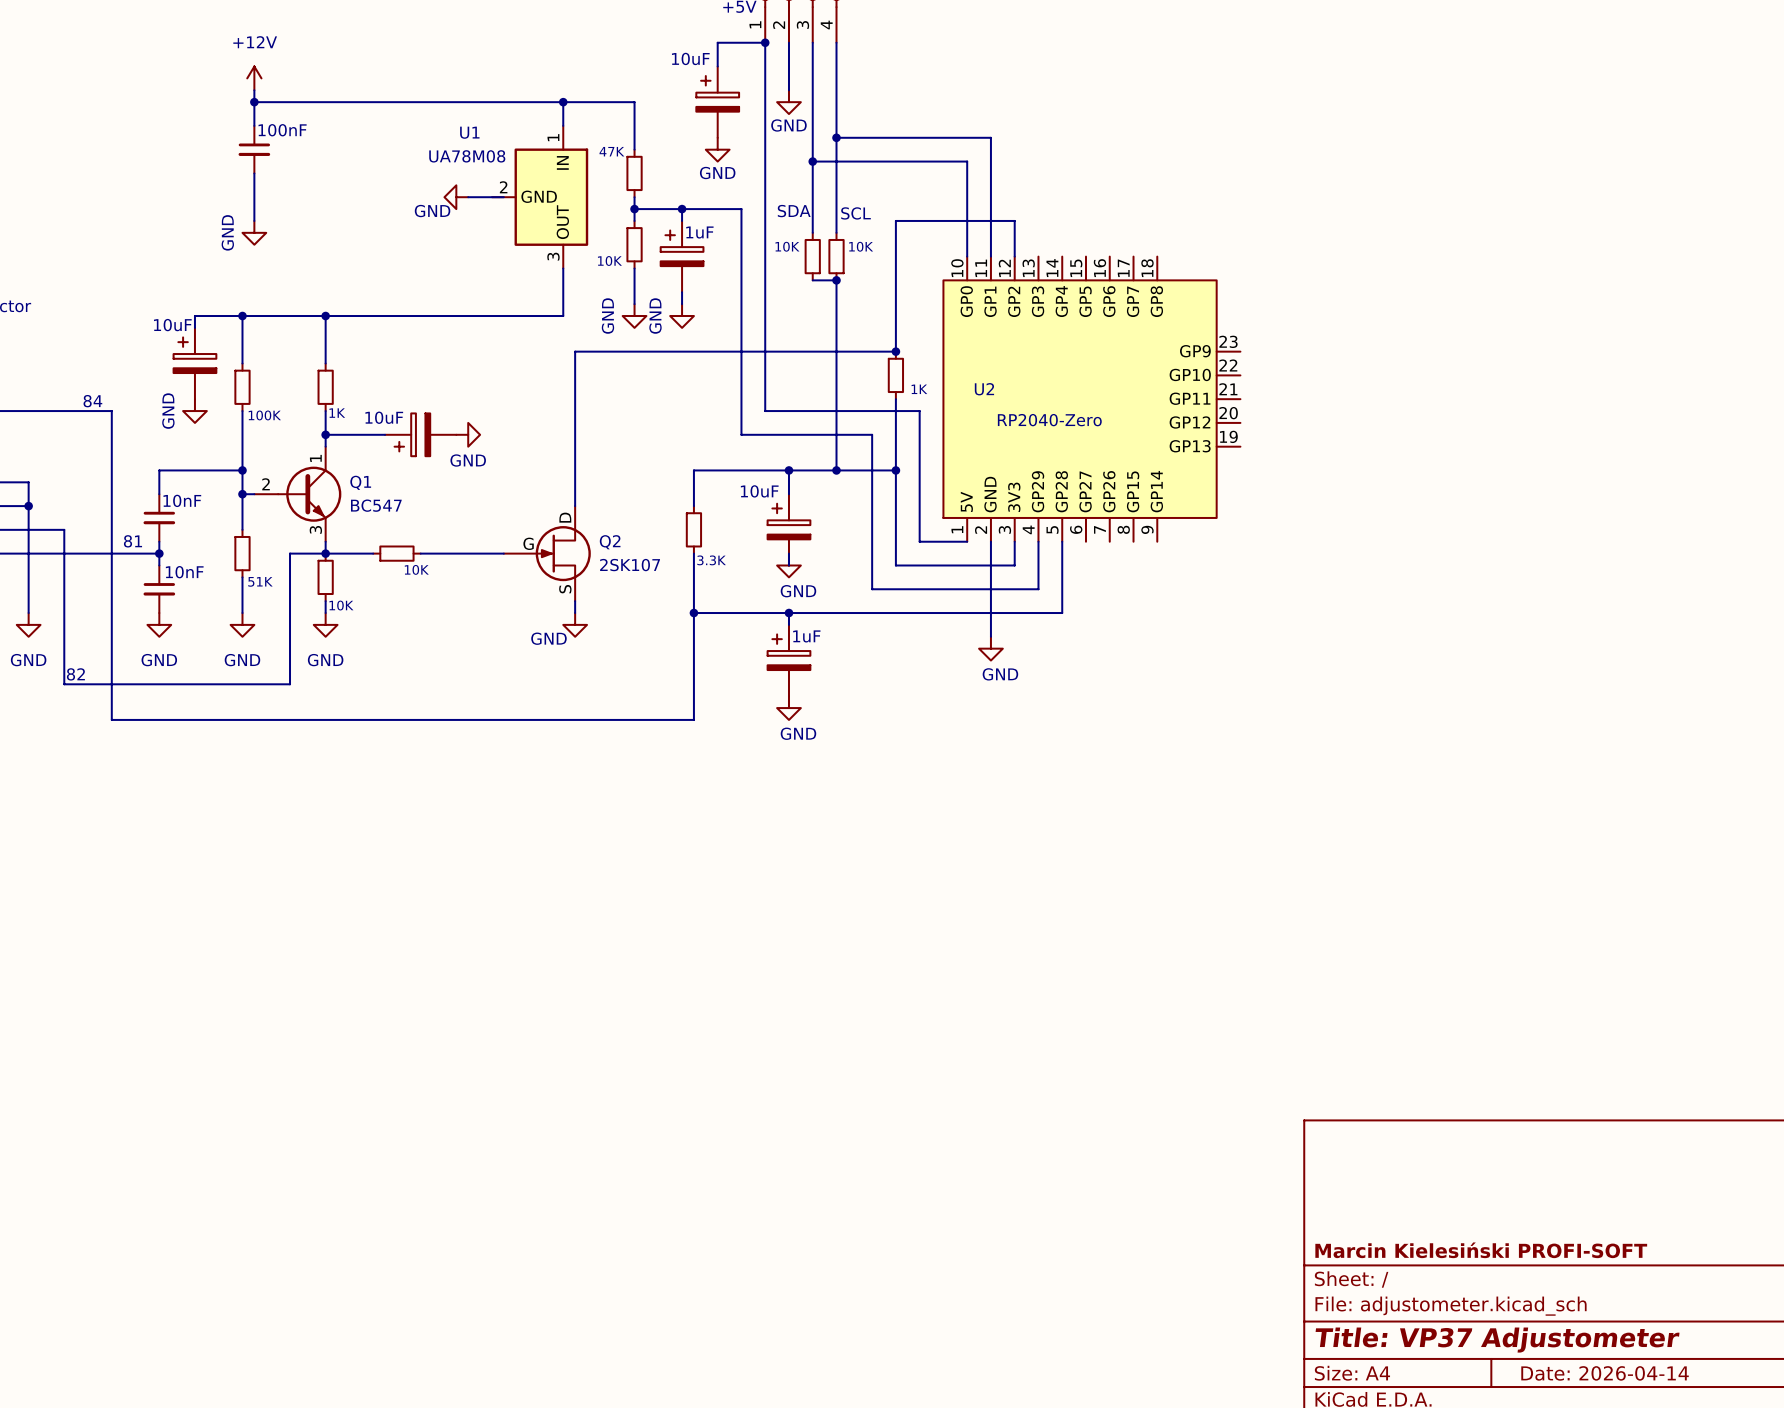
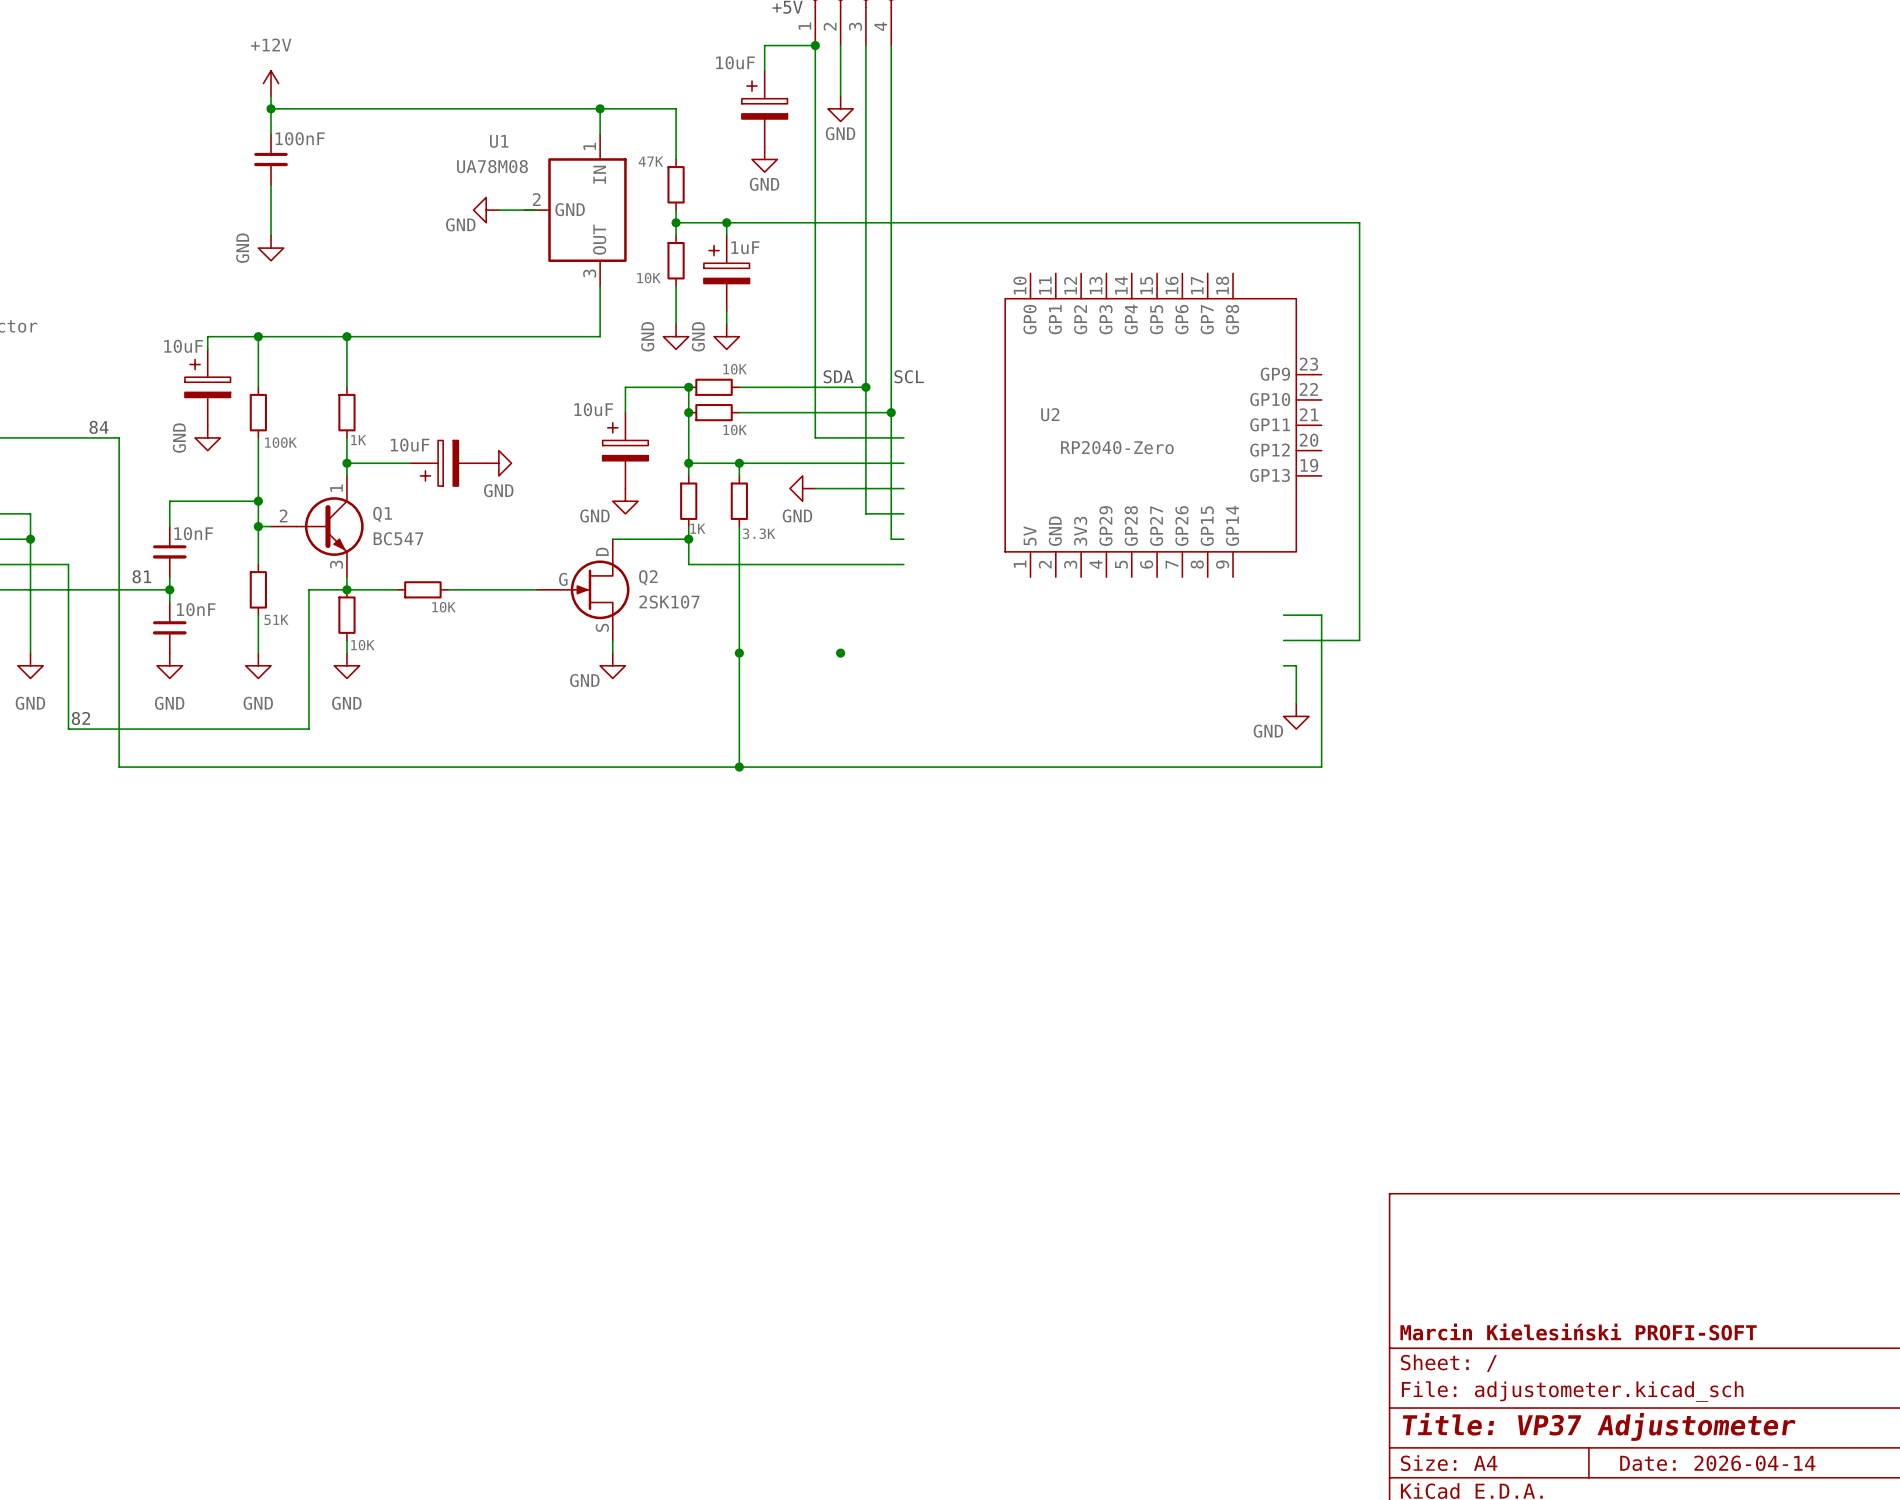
wire: (836, 137) (990, 137) (990, 256) -> none
junction: (836, 137) -> none
wire: (812, 161) (967, 161) (967, 256) -> none
junction: (812, 161) -> none
wire: (741, 209) (741, 434) -> (688, 463) (789, 463)
wire: none -> (789, 222) (1359, 222) (1359, 640) (1283, 640)
text position: SDA (794, 211) -> SDA (838, 376)
text position: SCL (856, 213) -> SCL (909, 376)
wire: none -> (865, 248) (865, 513) (903, 513)
10K: (812, 256) -> none
10K: (836, 256) -> none
wire: (1014, 256) (1014, 220) (895, 220) (895, 351) (575, 351) (575, 506) -> (688, 539) (612, 539)
wire: (812, 280) (836, 280) -> (891, 248) (891, 298)
junction: (836, 280) -> none
junction: (895, 351) -> none
junction: none -> (688, 387)
10K: none -> (714, 387)
wire: none -> (739, 387) (865, 387)
junction: none -> (865, 387)
1K: (895, 375) -> none
wire: none -> (625, 412) (625, 387) (688, 387) (688, 475)
junction: none -> (688, 412)
10K: none -> (714, 412)
wire: none -> (739, 412) (891, 412)
junction: none -> (891, 412)
wire: (895, 399) (895, 565) (1014, 565) (1014, 541) -> none
wire: (848, 411) (919, 411) (919, 541) (967, 541) -> none
junction: none -> (688, 463)
junction: none -> (739, 463)
wire: (848, 434) (872, 434) (872, 589) (1038, 589) (1038, 541) -> none
power symbol: none -> GND (802, 488)
wire: none -> (815, 488) (903, 488)
power symbol: none -> GND (625, 501)
1K: none -> (688, 501)
wire: (788, 470) (788, 494) -> none
junction: (788, 470) -> none
wire: none -> (891, 501) (891, 539) (903, 539)
junction: (836, 470) -> none
wire: (895, 470) (693, 470) (693, 494) -> none
junction: (895, 470) -> none
wire: none -> (688, 526) (688, 564) (903, 564)
junction: none -> (688, 539)
wire: none -> (739, 539) (739, 589)
3.3K position: (693, 529) -> (739, 501)
10uF position: (788, 529) -> (625, 450)
wire: (990, 541) (990, 636) -> none
wire: (1062, 541) (1062, 613) (693, 613) -> none
wire: (788, 553) (788, 565) -> (739, 463) (739, 475)
power symbol: GND (788, 565) -> none
wire: none -> (1283, 615) (1321, 615) (1321, 767) (739, 767)
wire: (788, 613) (788, 624) -> none
wire: none -> (1283, 665) (1296, 665) (1296, 703)
power symbol: GND (990, 648) -> none
1uF: (788, 660) -> none
power symbol: none -> GND (1296, 716)
power symbol: GND (788, 708) -> none
junction: none -> (739, 767)

